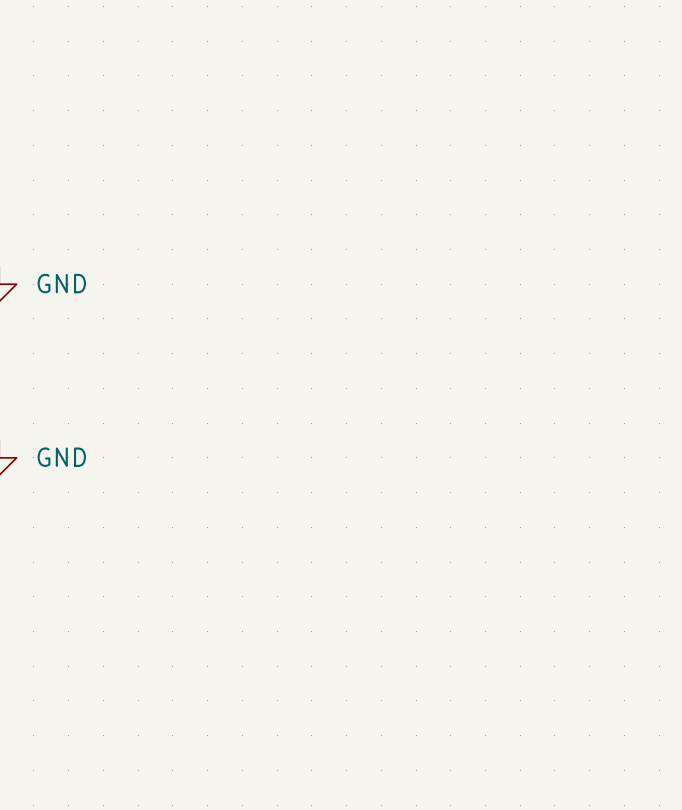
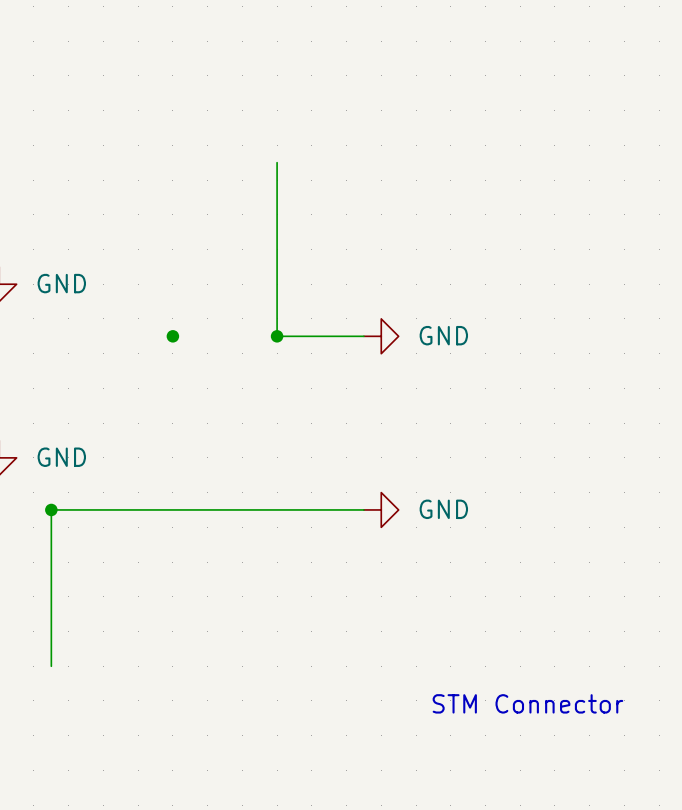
wire: none -> (277, 162) (277, 336) (363, 336)
junction: none -> (172, 336)
junction: none -> (277, 336)
power symbol: none -> GND (381, 336)
junction: none -> (51, 509)
wire: none -> (363, 509) (51, 509) (51, 666)
power symbol: none -> GND (381, 509)
text: none -> STM Connector (527, 703)

